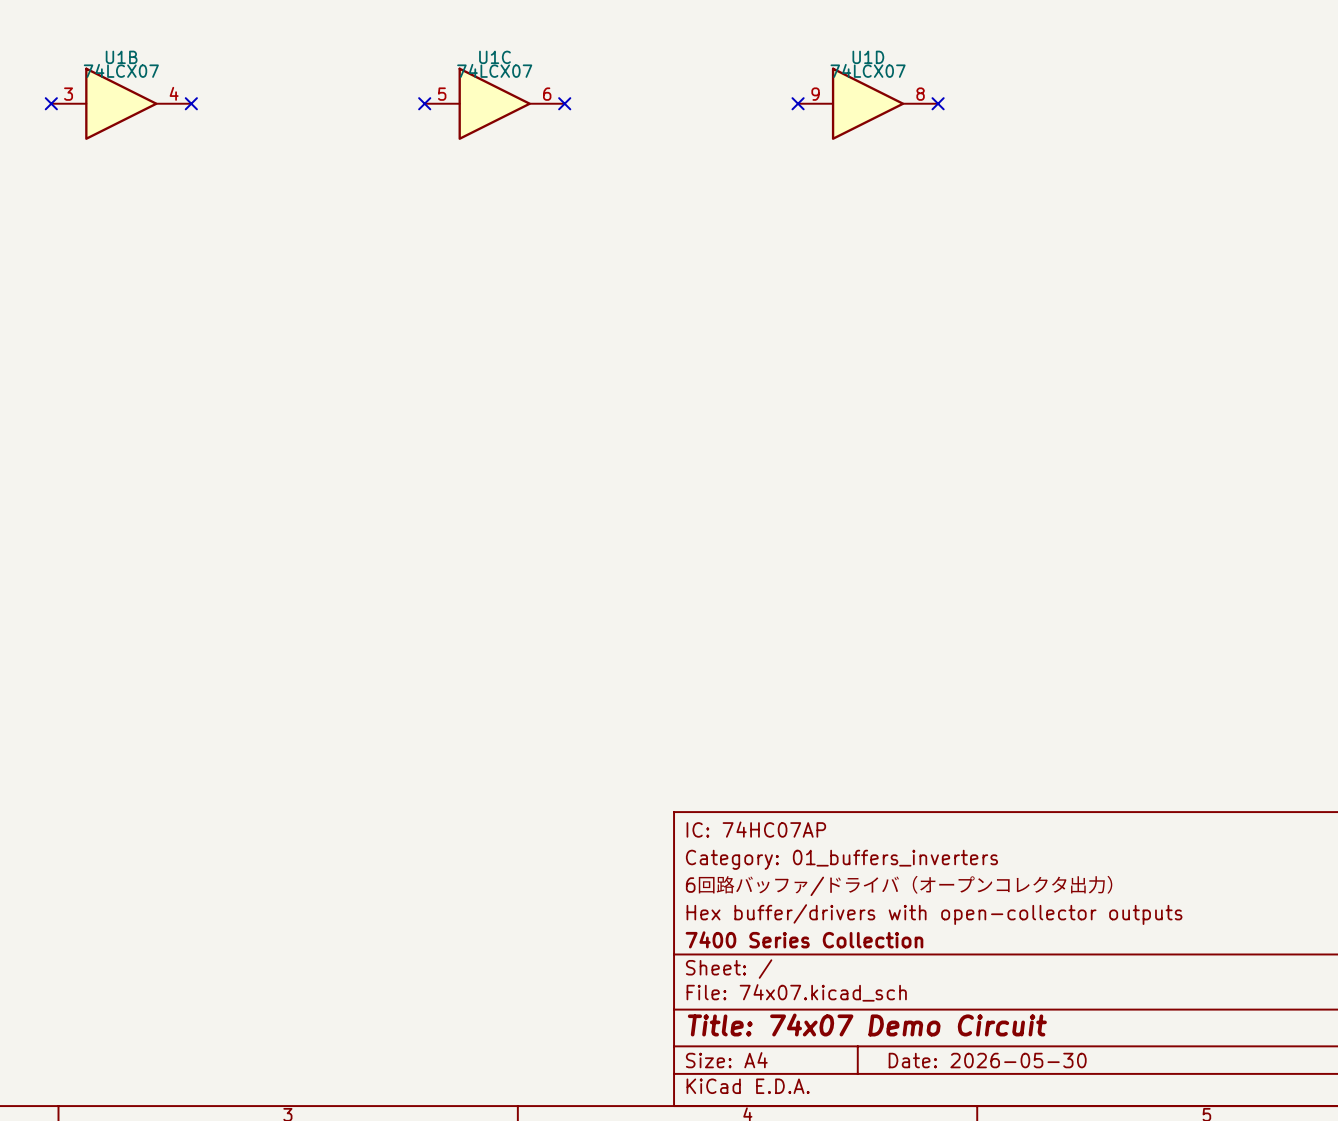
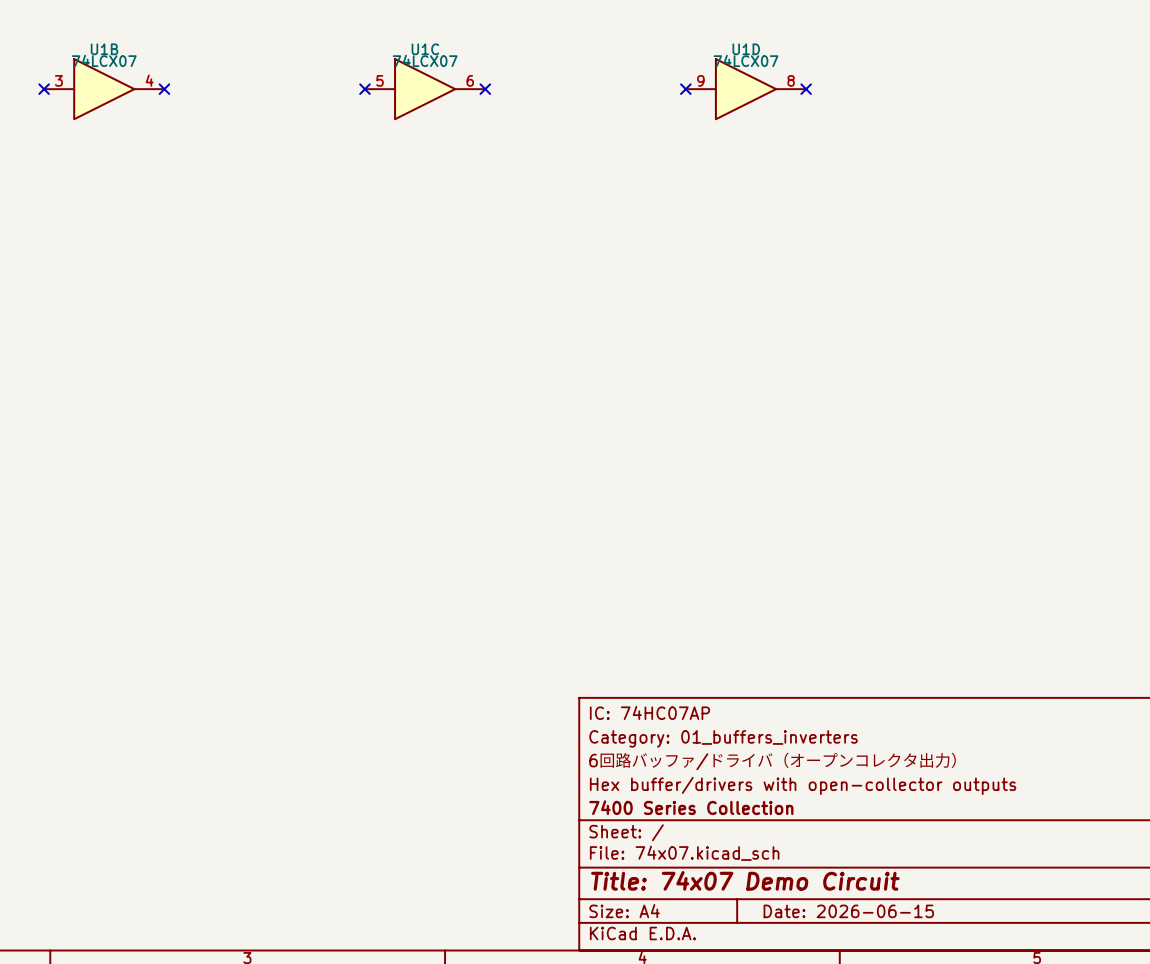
title block: Date: 2026-05-30 (987, 1060) -> Date: 2026-06-15 (848, 911)

